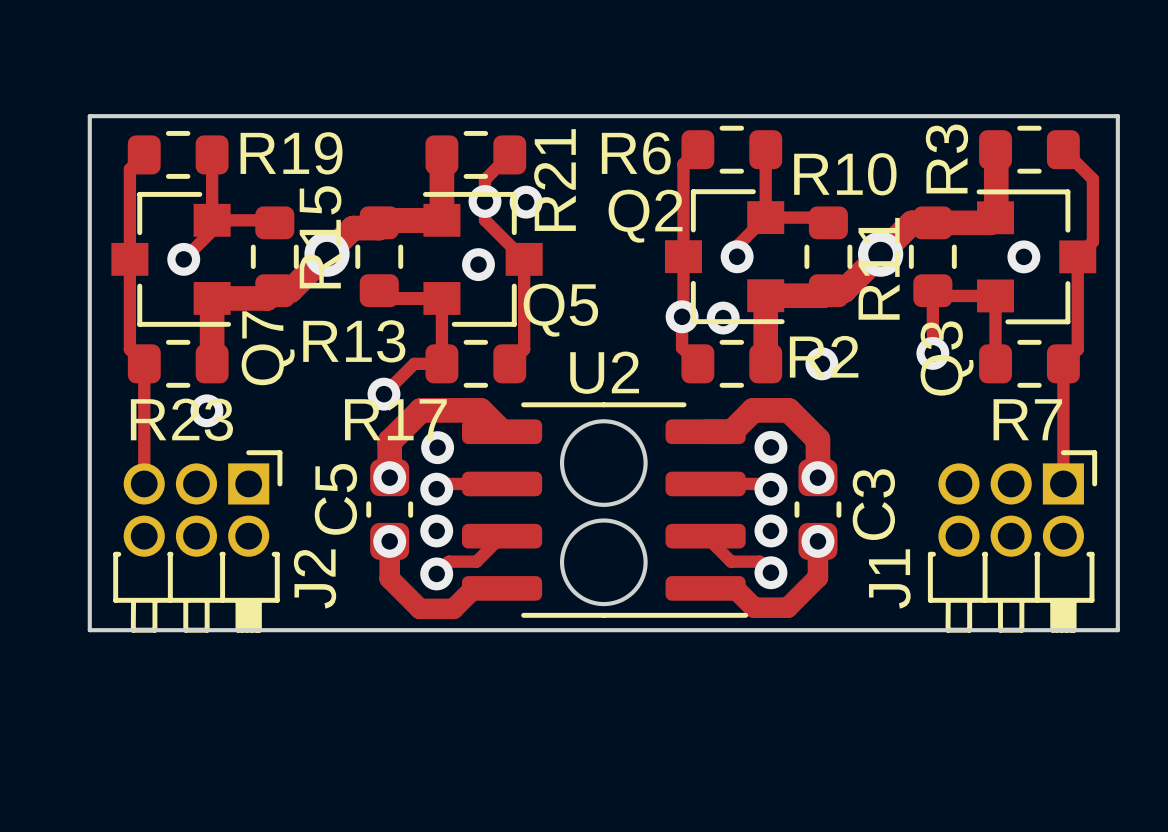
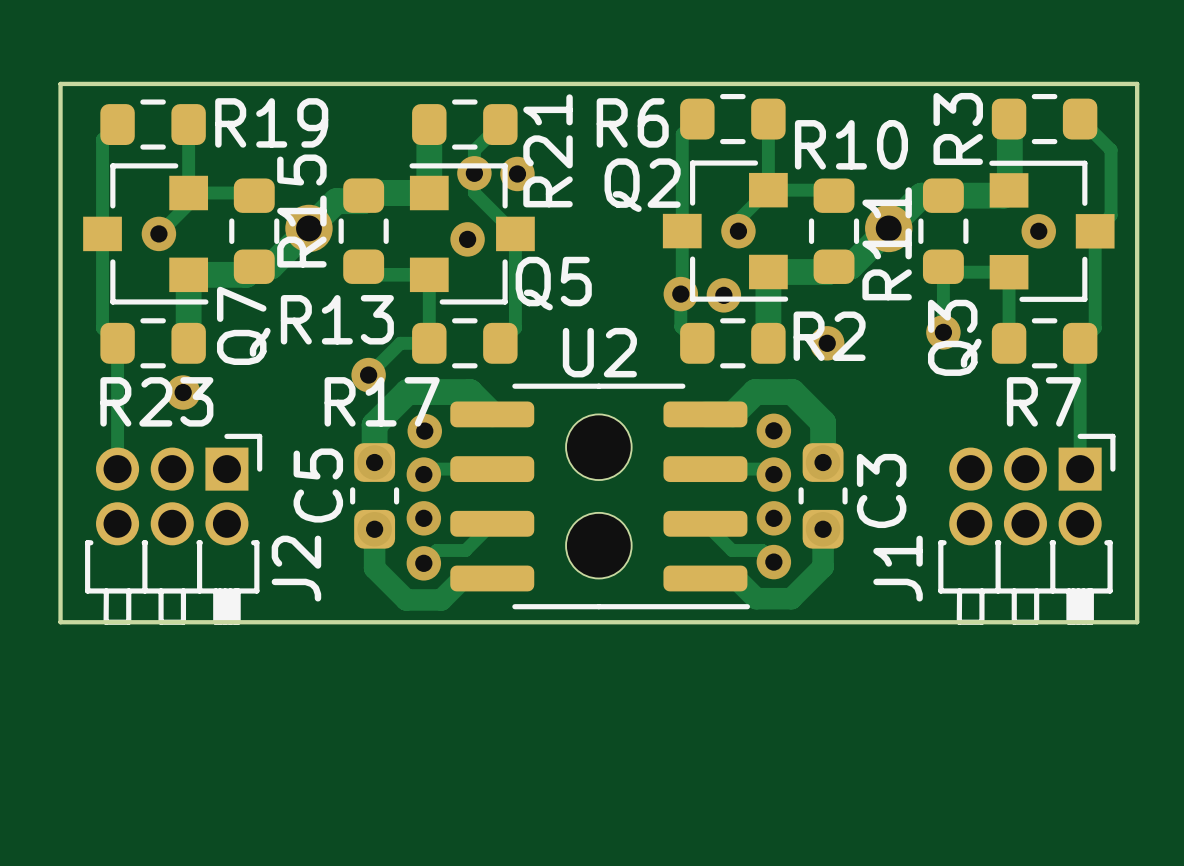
round board edge: [559, 419, 648, 507] -> none
part: none -> (598, 447)
round board edge: [559, 518, 648, 607] -> none
part: none -> (598, 545)

